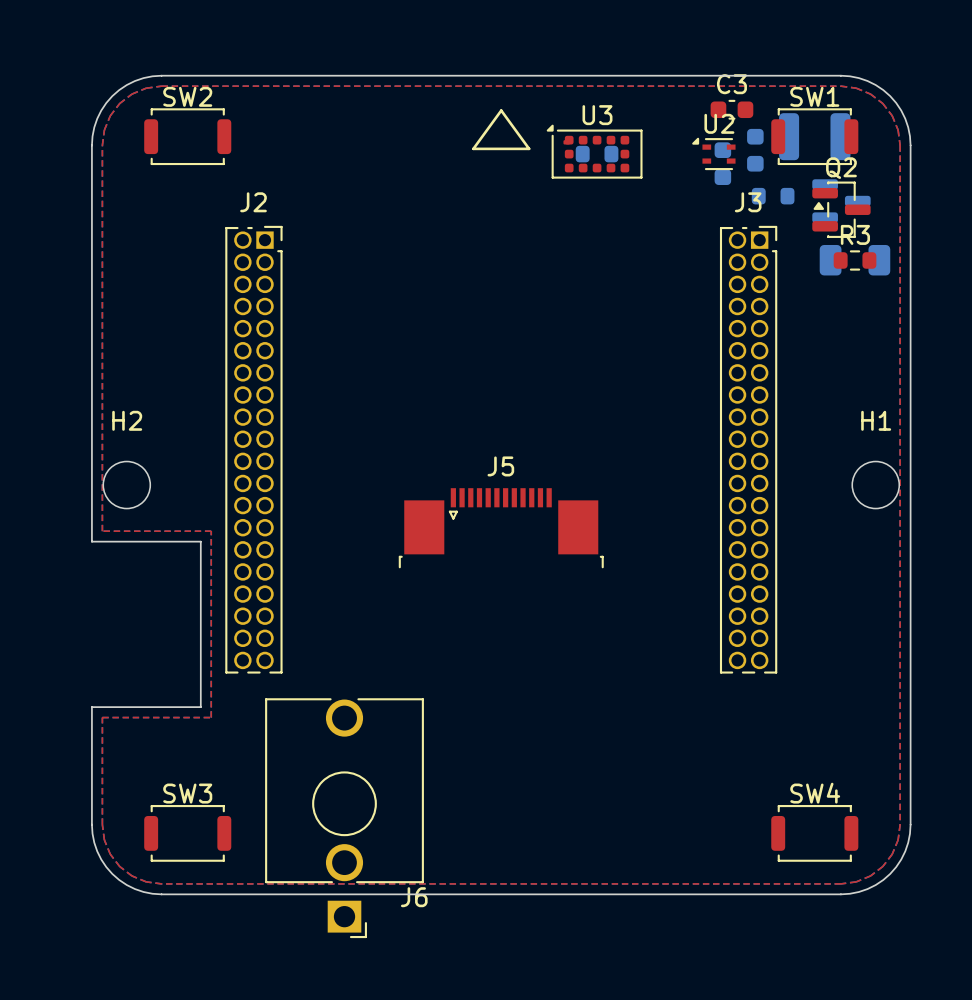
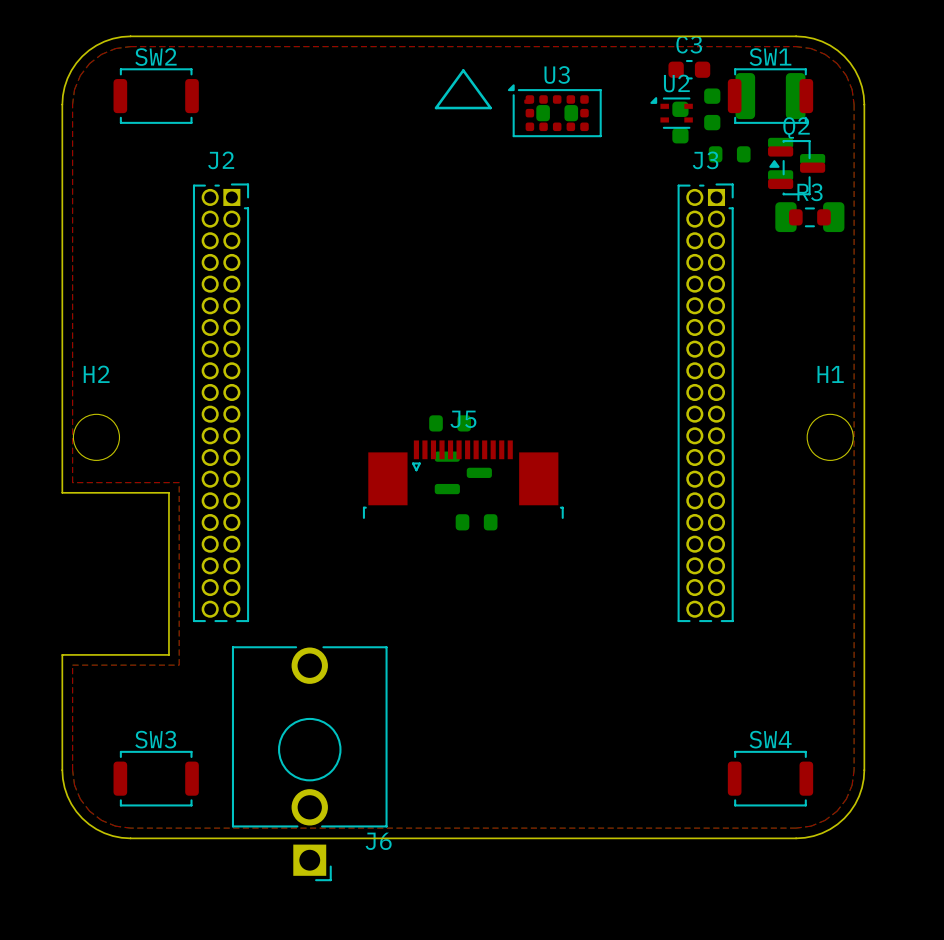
part: none -> (450, 423)
part: none -> (463, 472)
part: none -> (476, 522)

